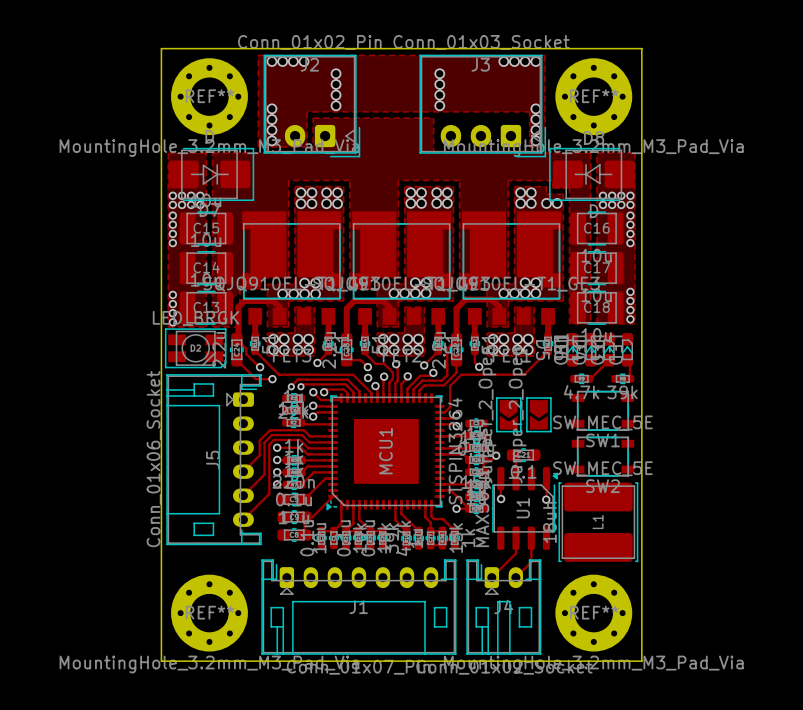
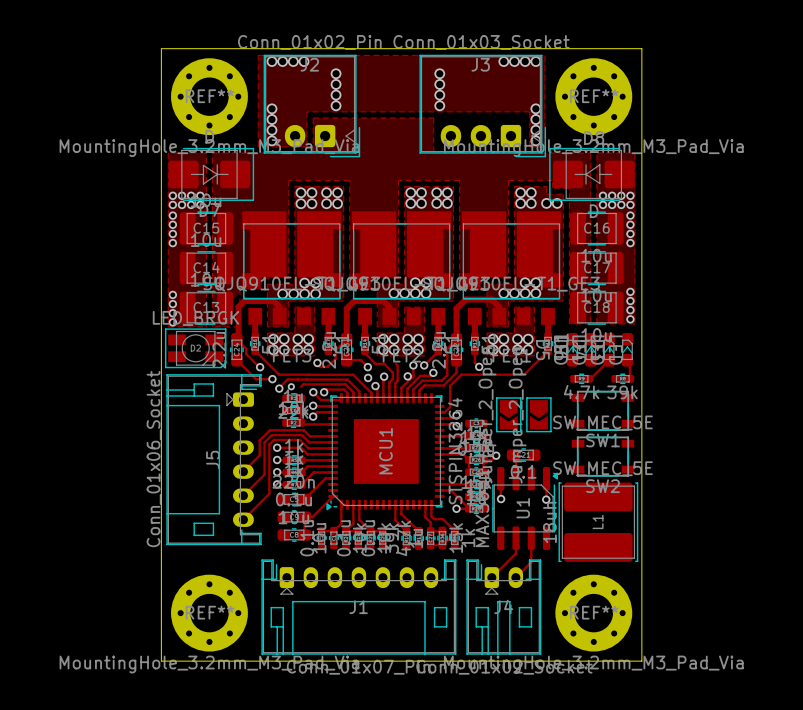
track: none -> (346, 339) (335, 350) (335, 358) (327, 366) (319, 366)
track: (328, 351) (317, 362) -> none
via position: (396, 364) -> (413, 365)
track: (407, 376) (401, 384) (401, 388) -> (413, 365) (413, 376) (401, 388)
track: (297, 379) (291, 386) -> (297, 379) (287, 379) (279, 388)
via: (300, 386) -> none
via: none -> (279, 388)

